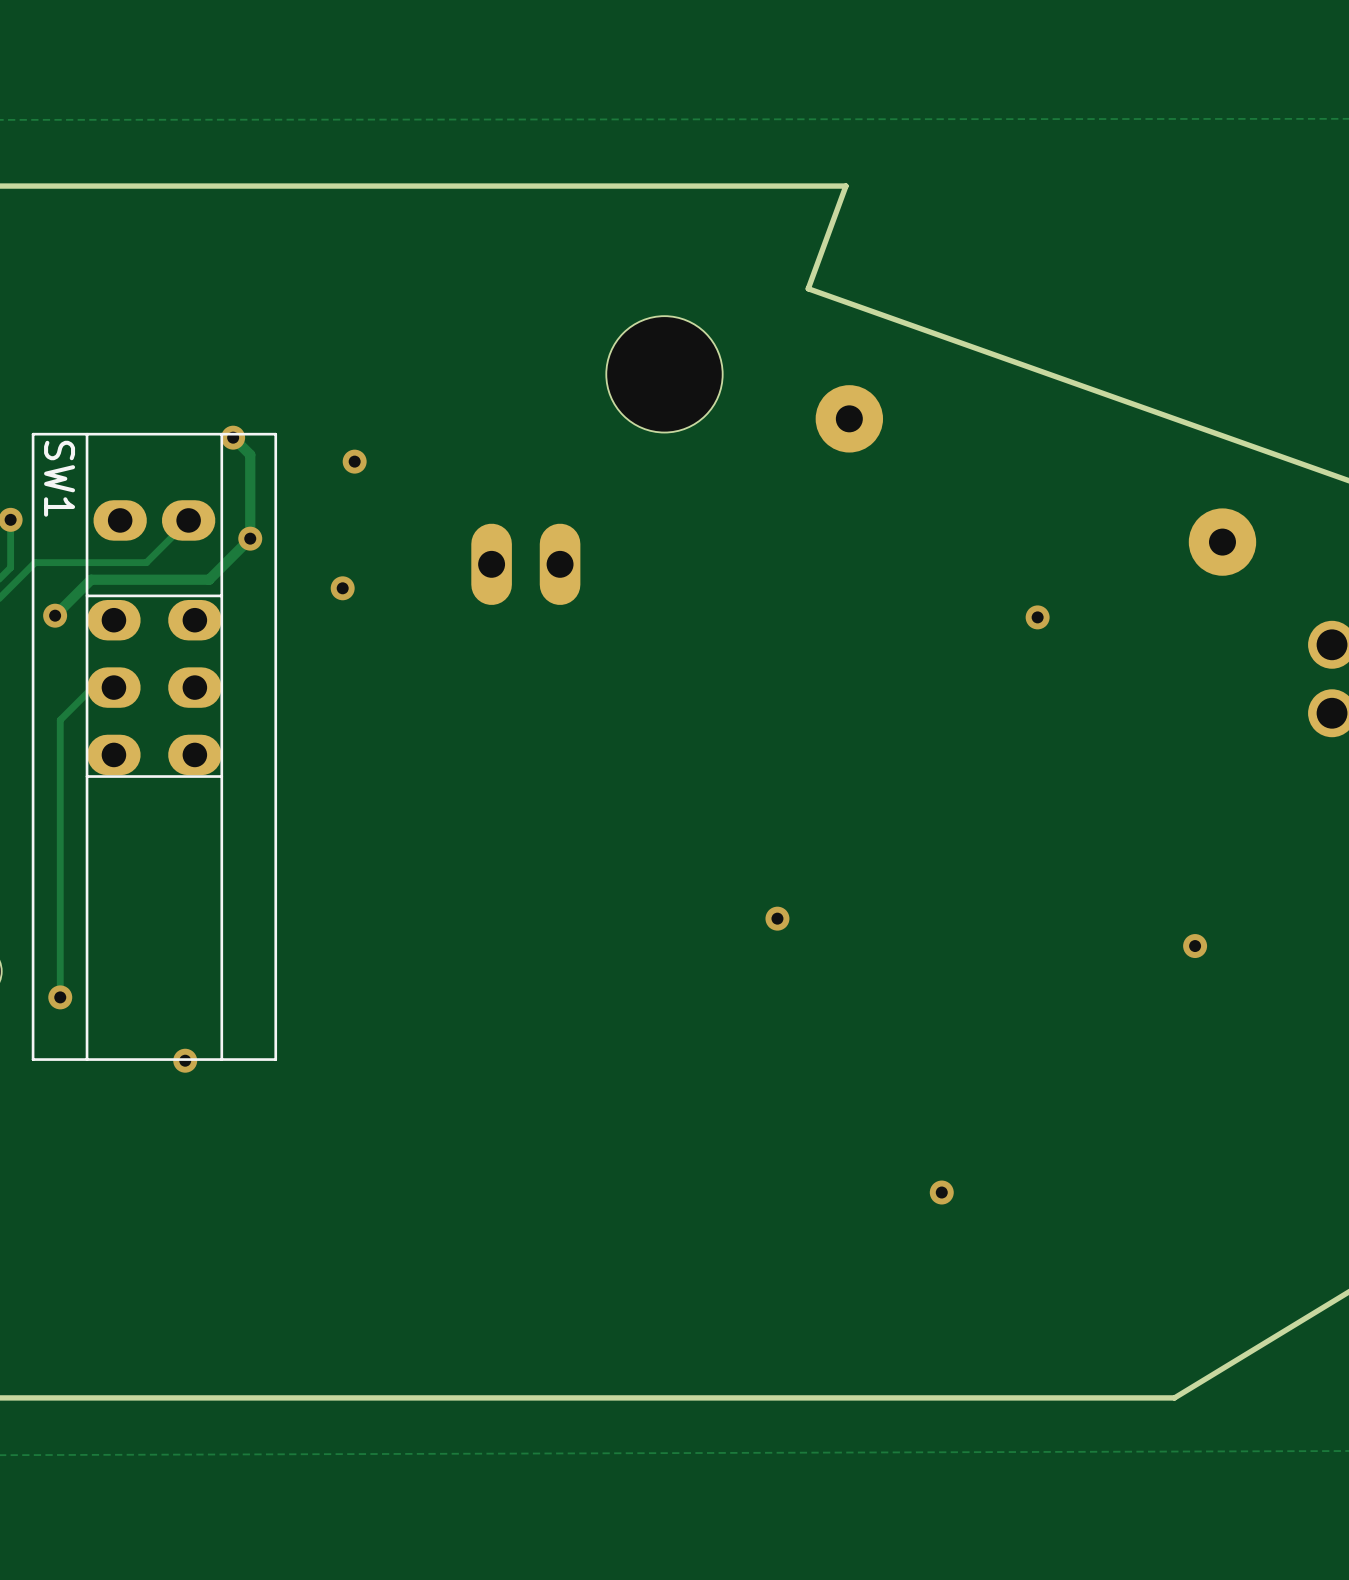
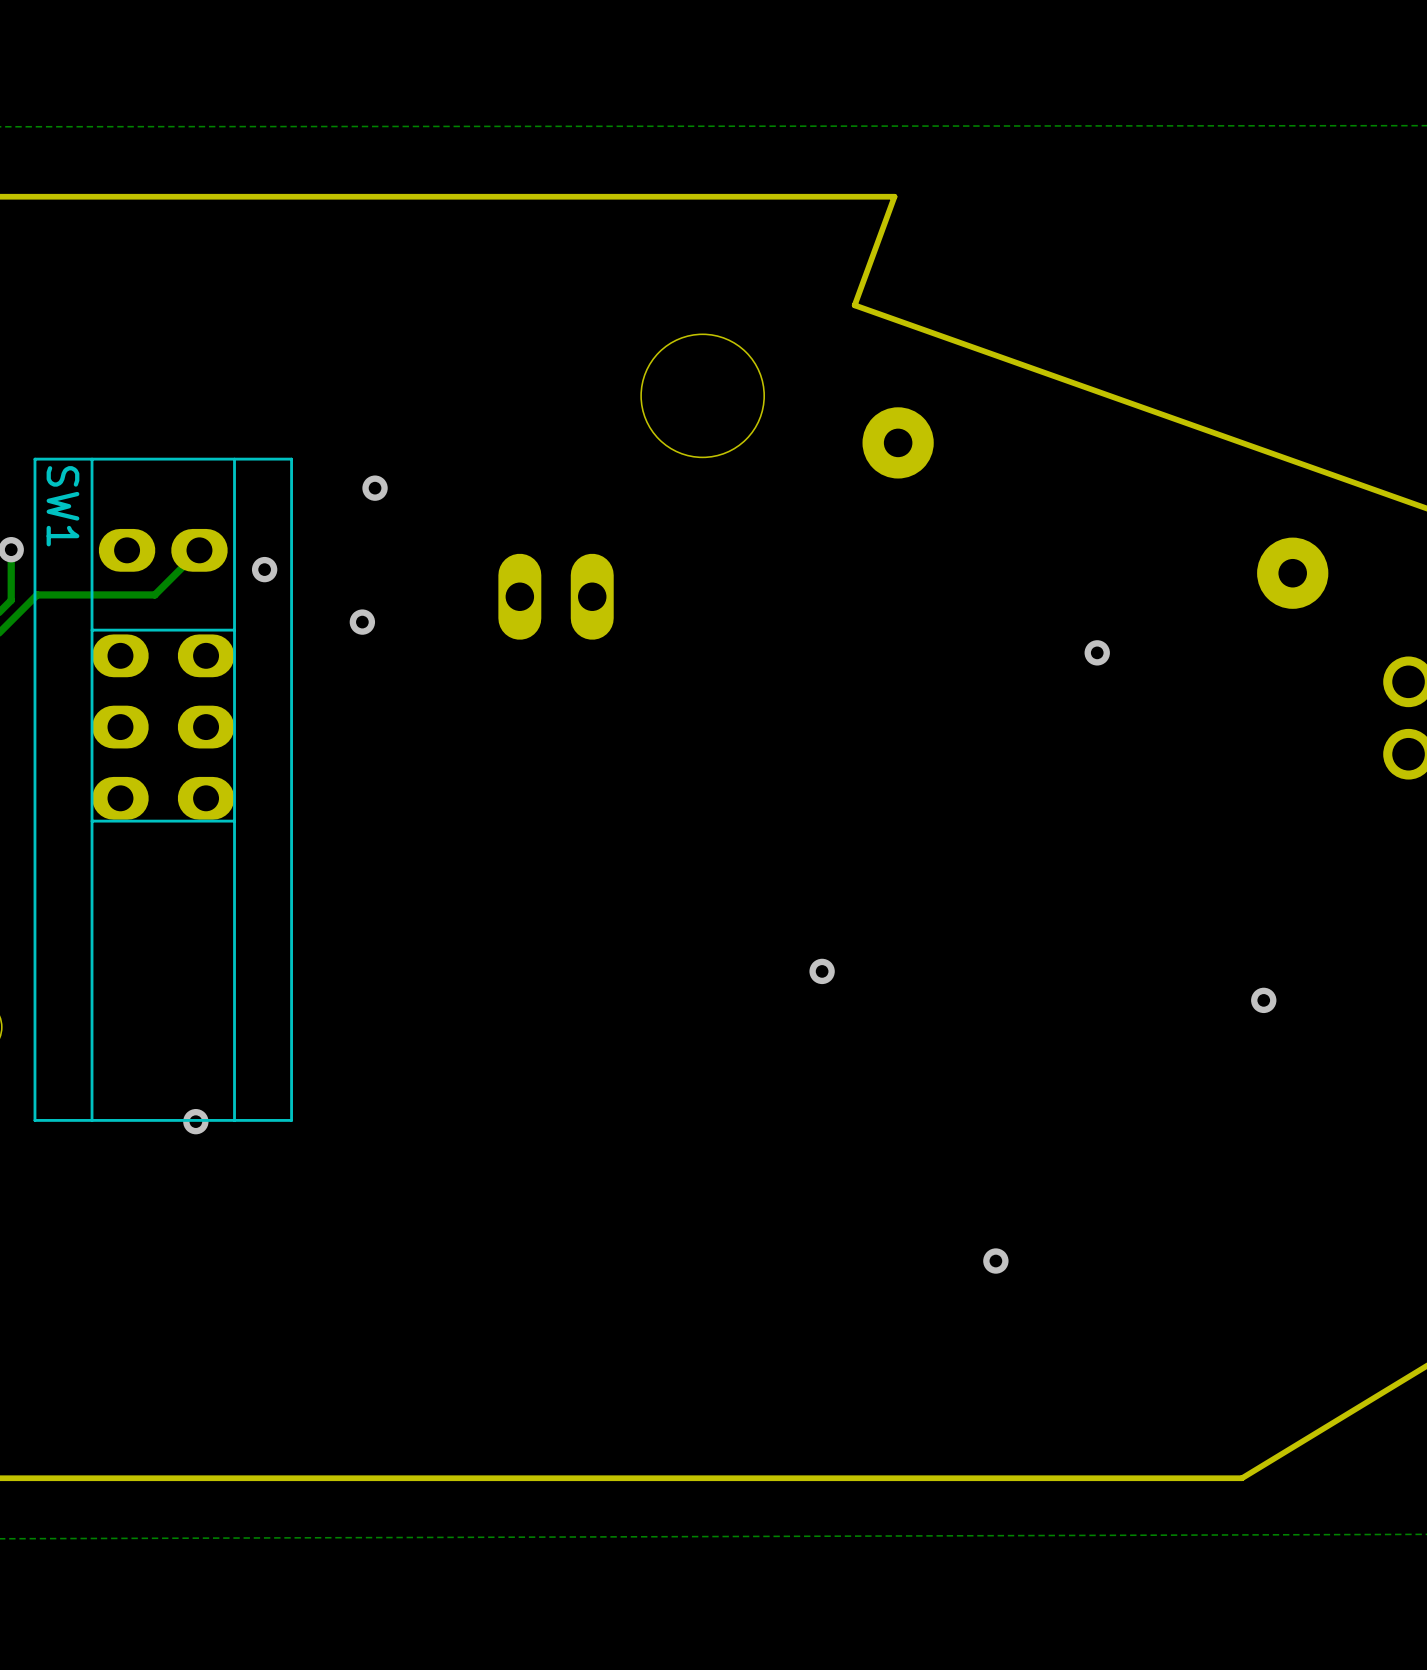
track: (233, 437) (250, 454) (250, 538) (209, 579) (91, 579) (55, 615) -> none
via: (233, 437) -> none
via: (55, 615) -> none
track: (113, 687) (92, 687) (60, 720) (60, 997) -> none
via: (60, 997) -> none

